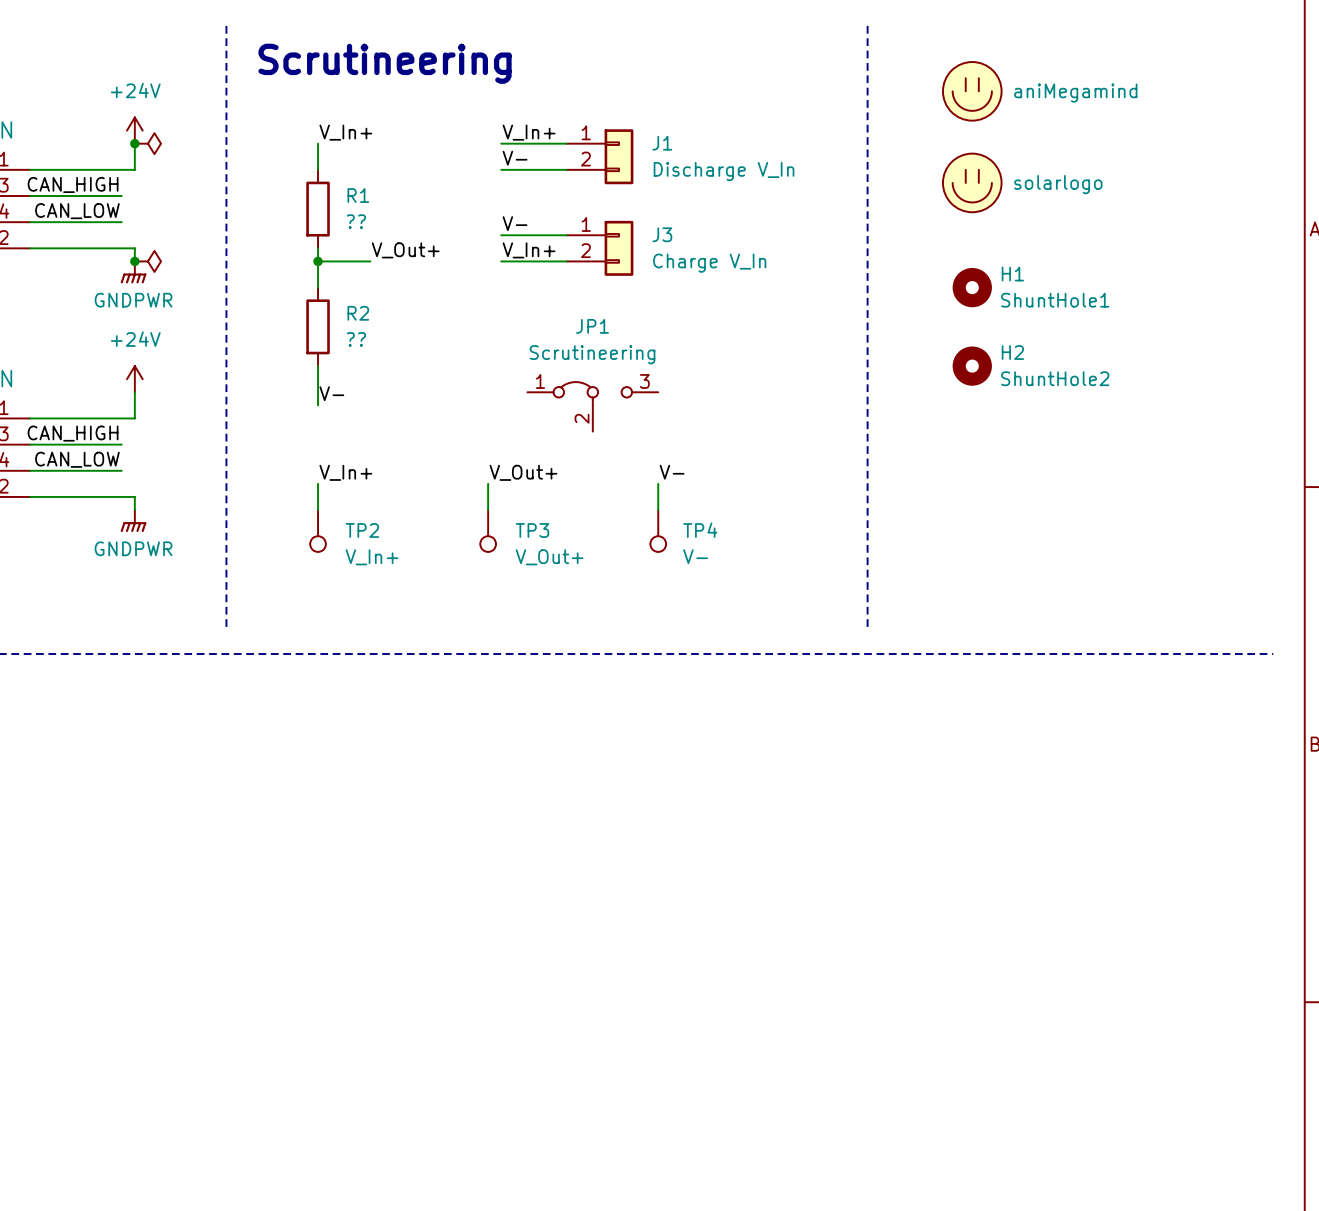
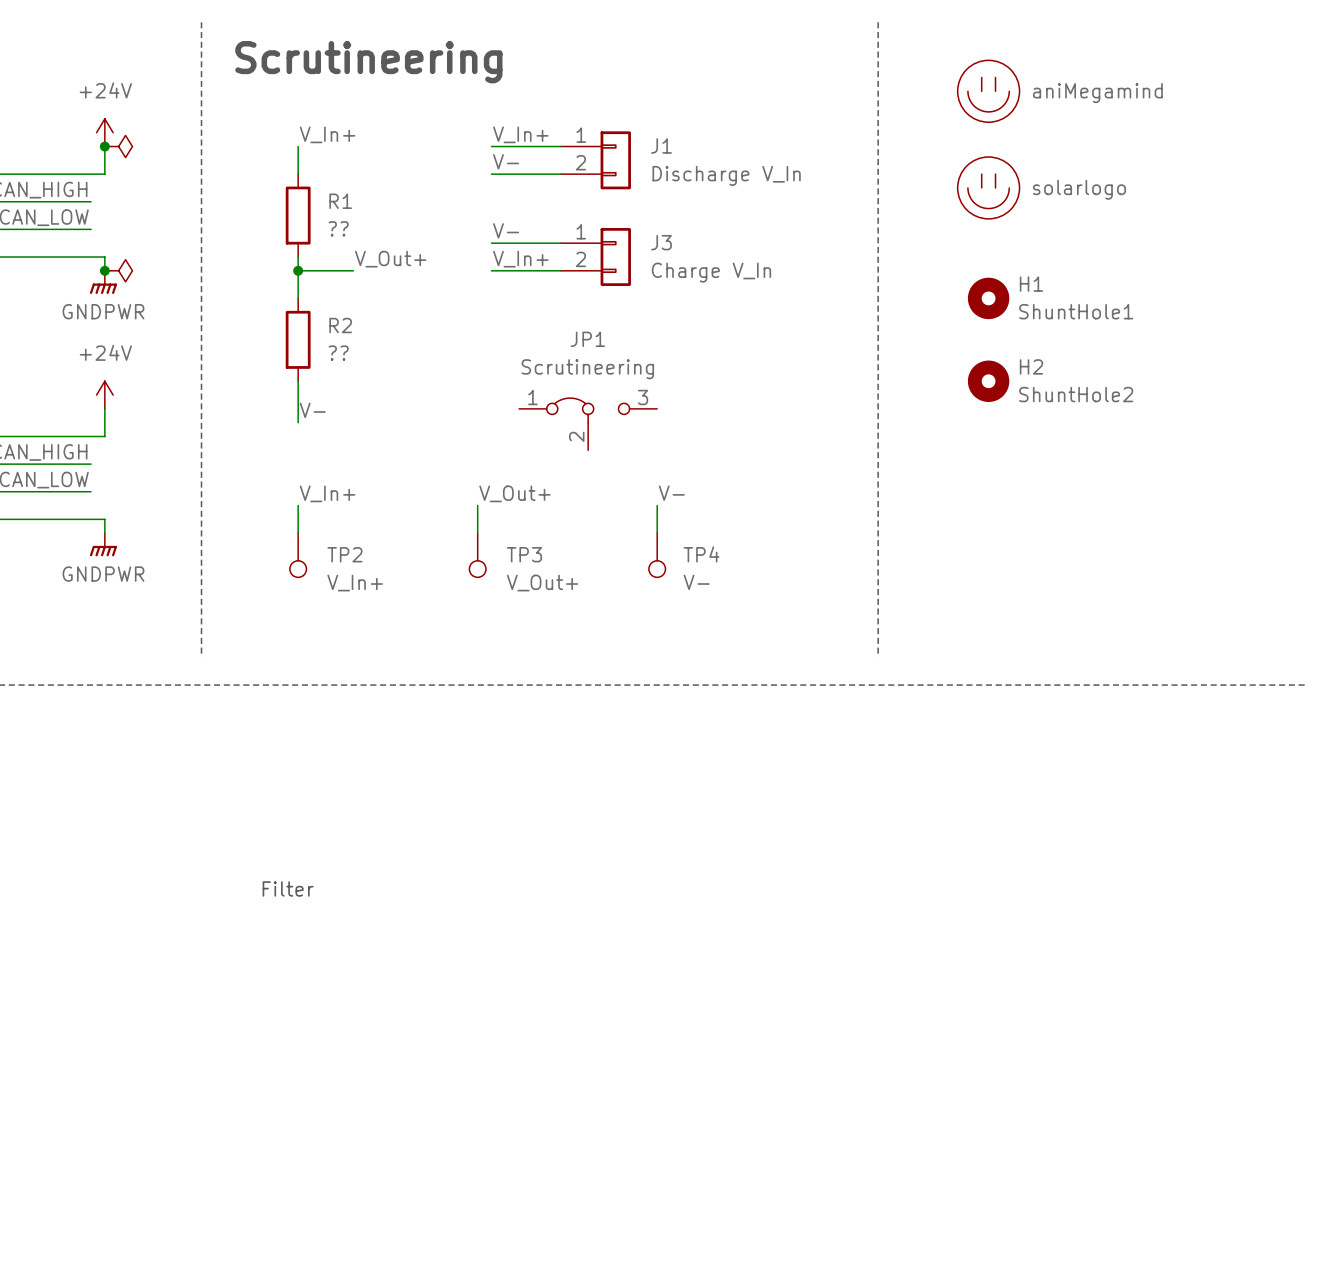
text: none -> Filter (288, 888)

